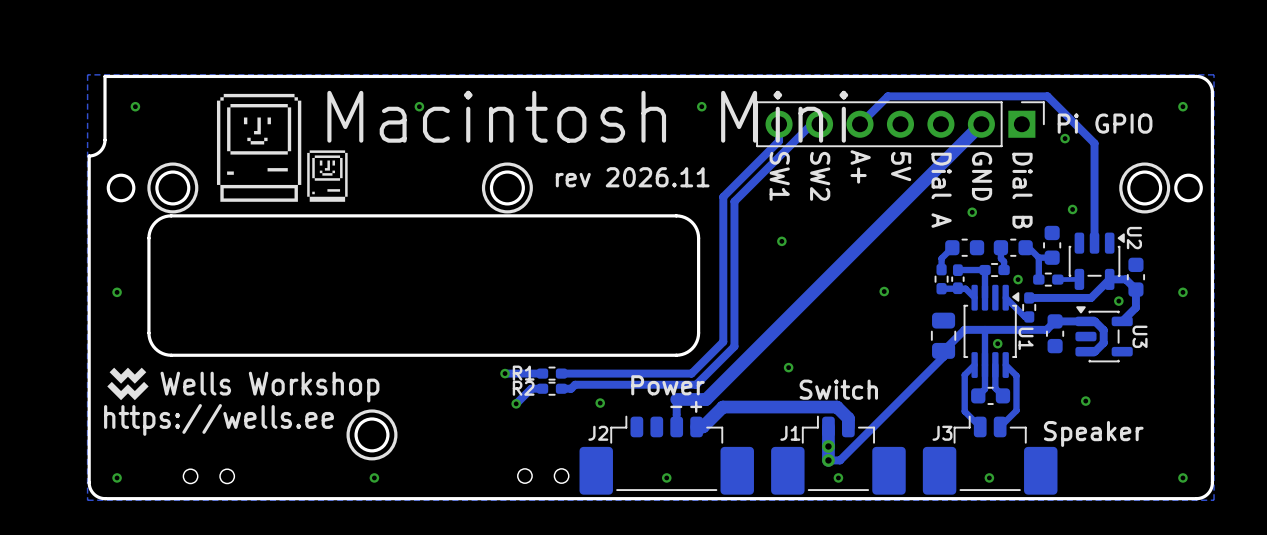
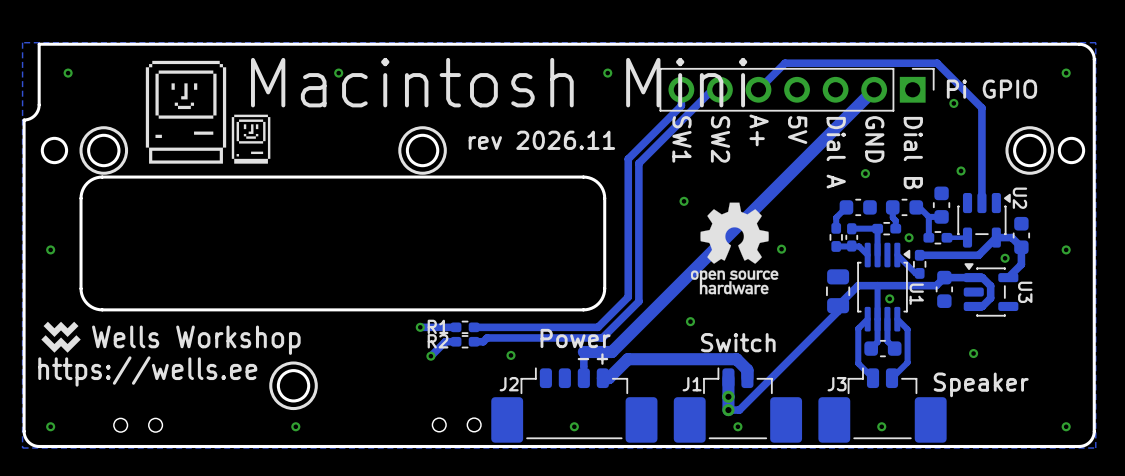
drawing: none -> [690, 202, 779, 295]

